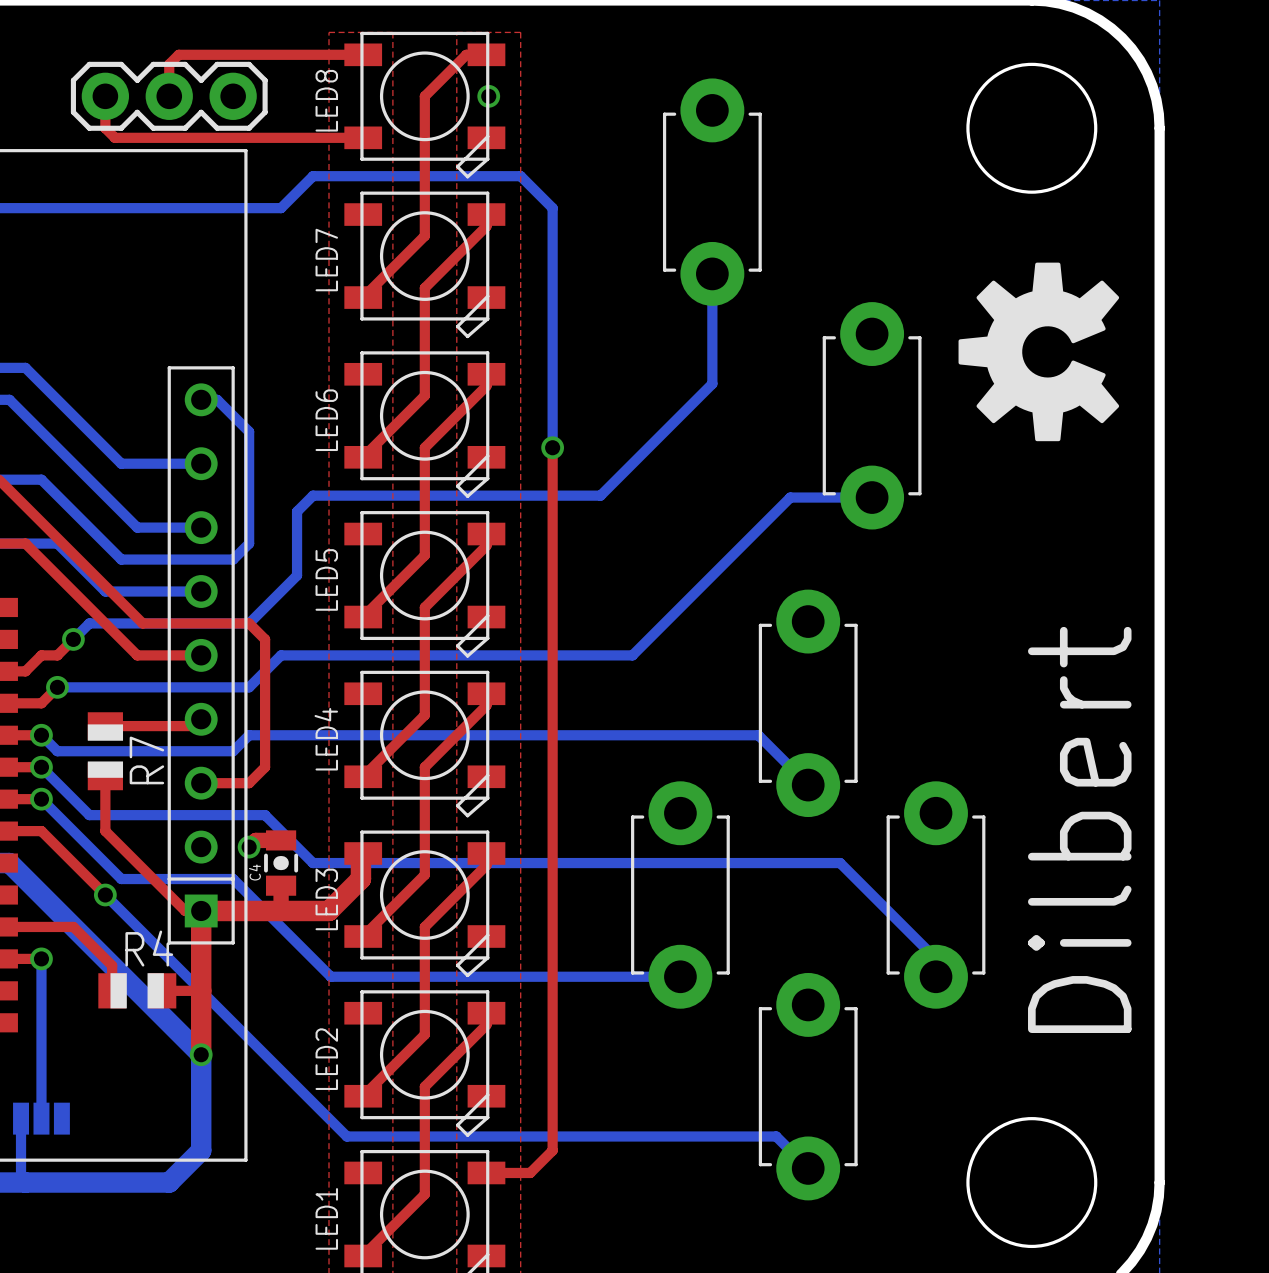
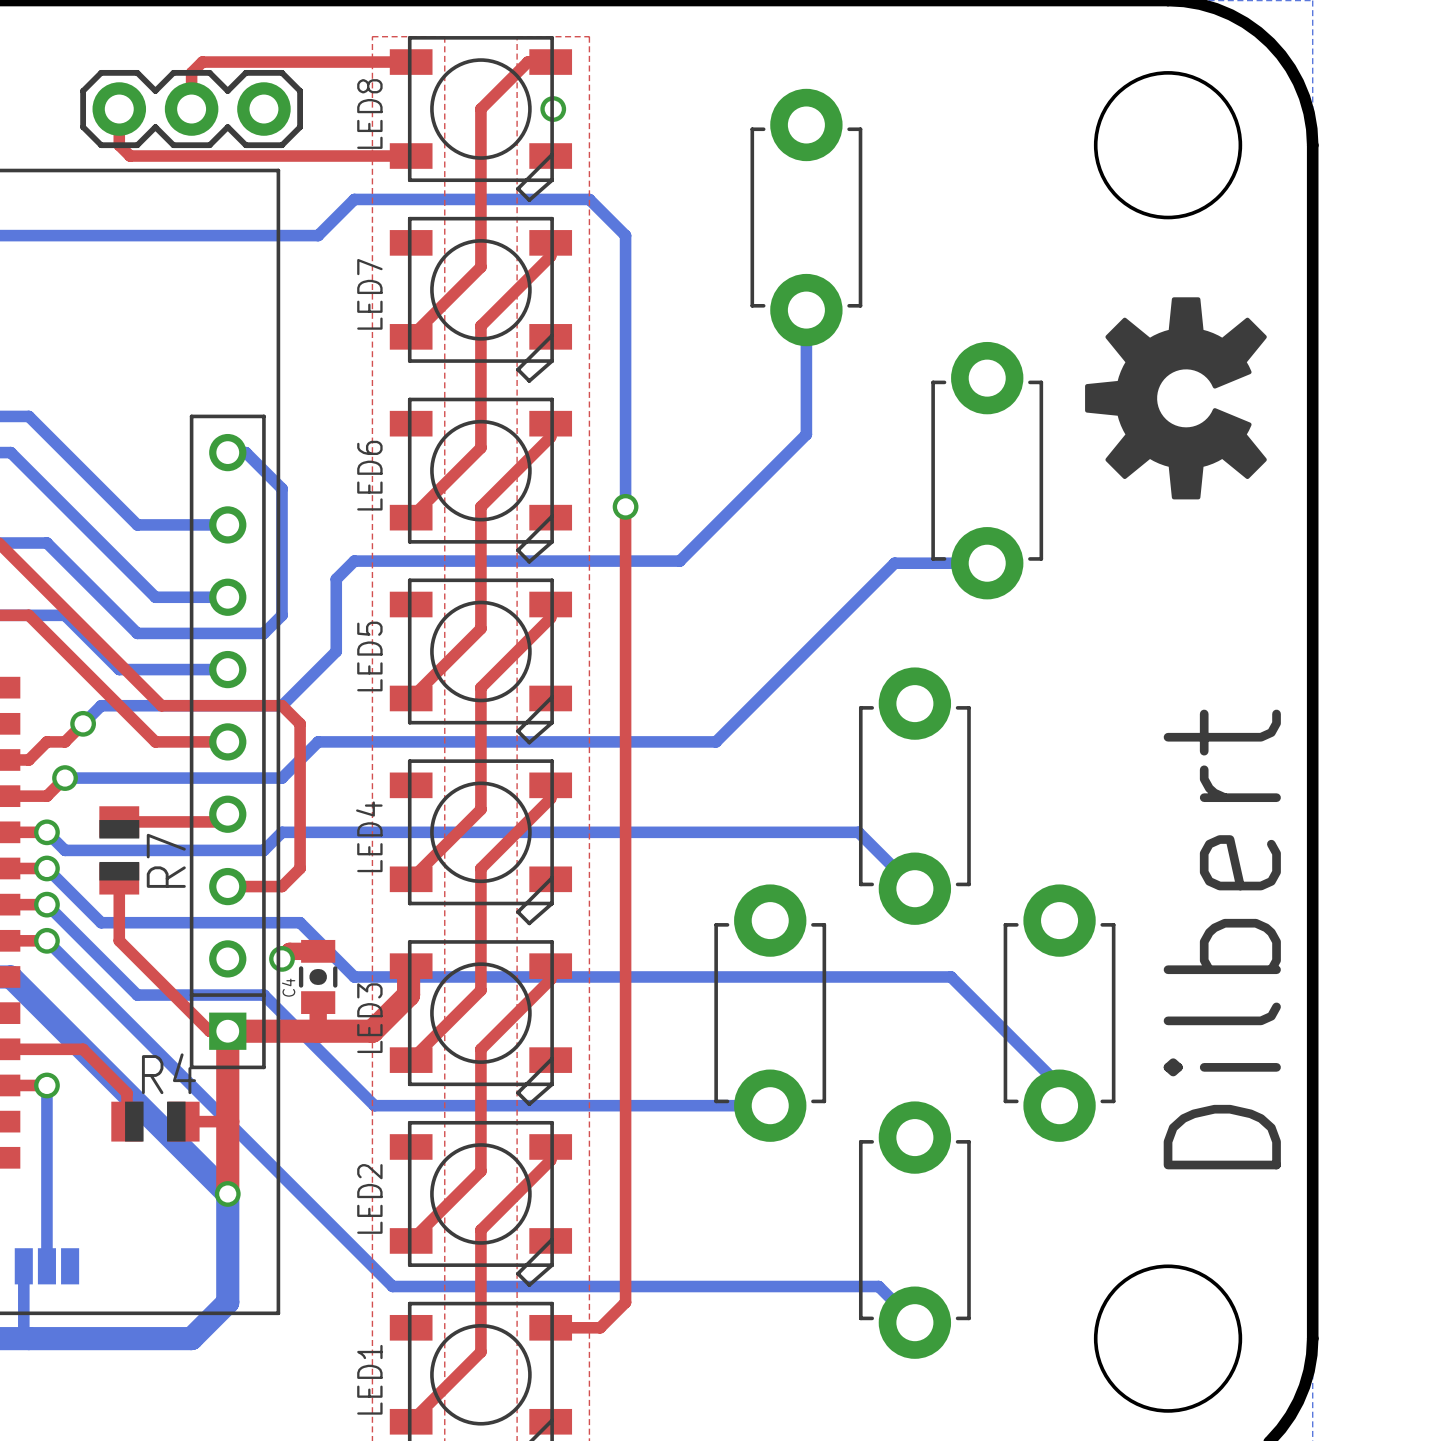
top track: (41, 831) (105, 895) -> none
bottom track: none -> (46, 940) (119, 1013)
via position: (105, 895) -> (46, 940)

